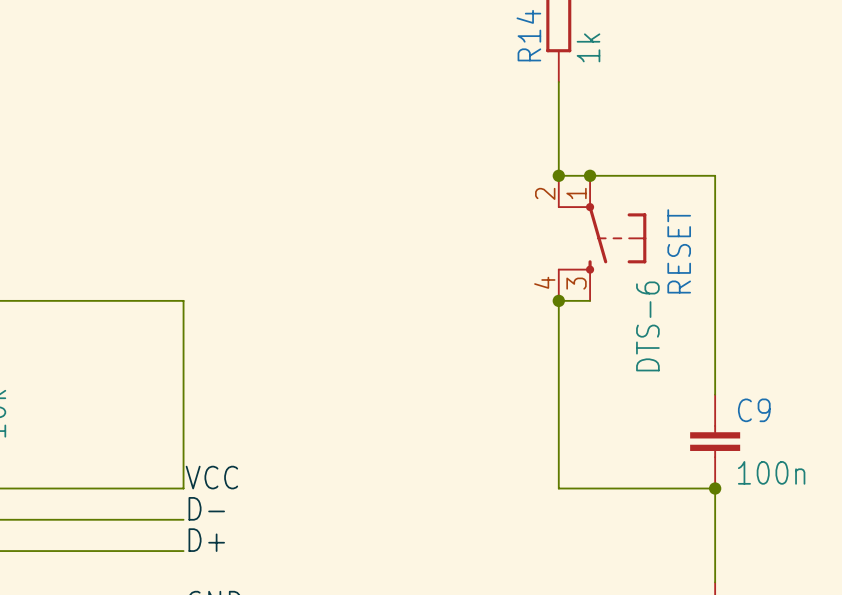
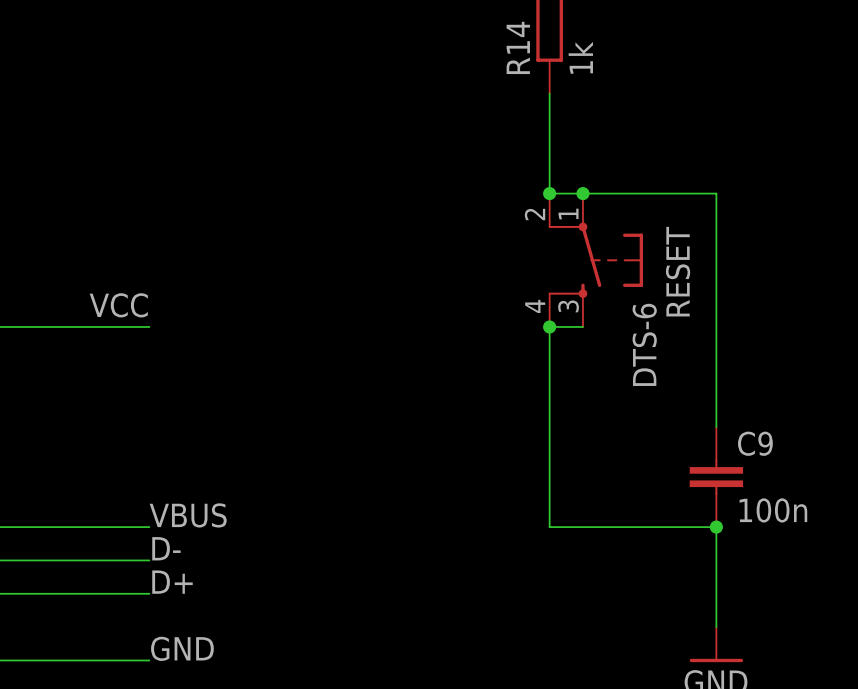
label: none -> VCC (118, 305)
wire: (183, 300) (183, 488) -> none
label: VCC (211, 477) -> VBUS (188, 515)

